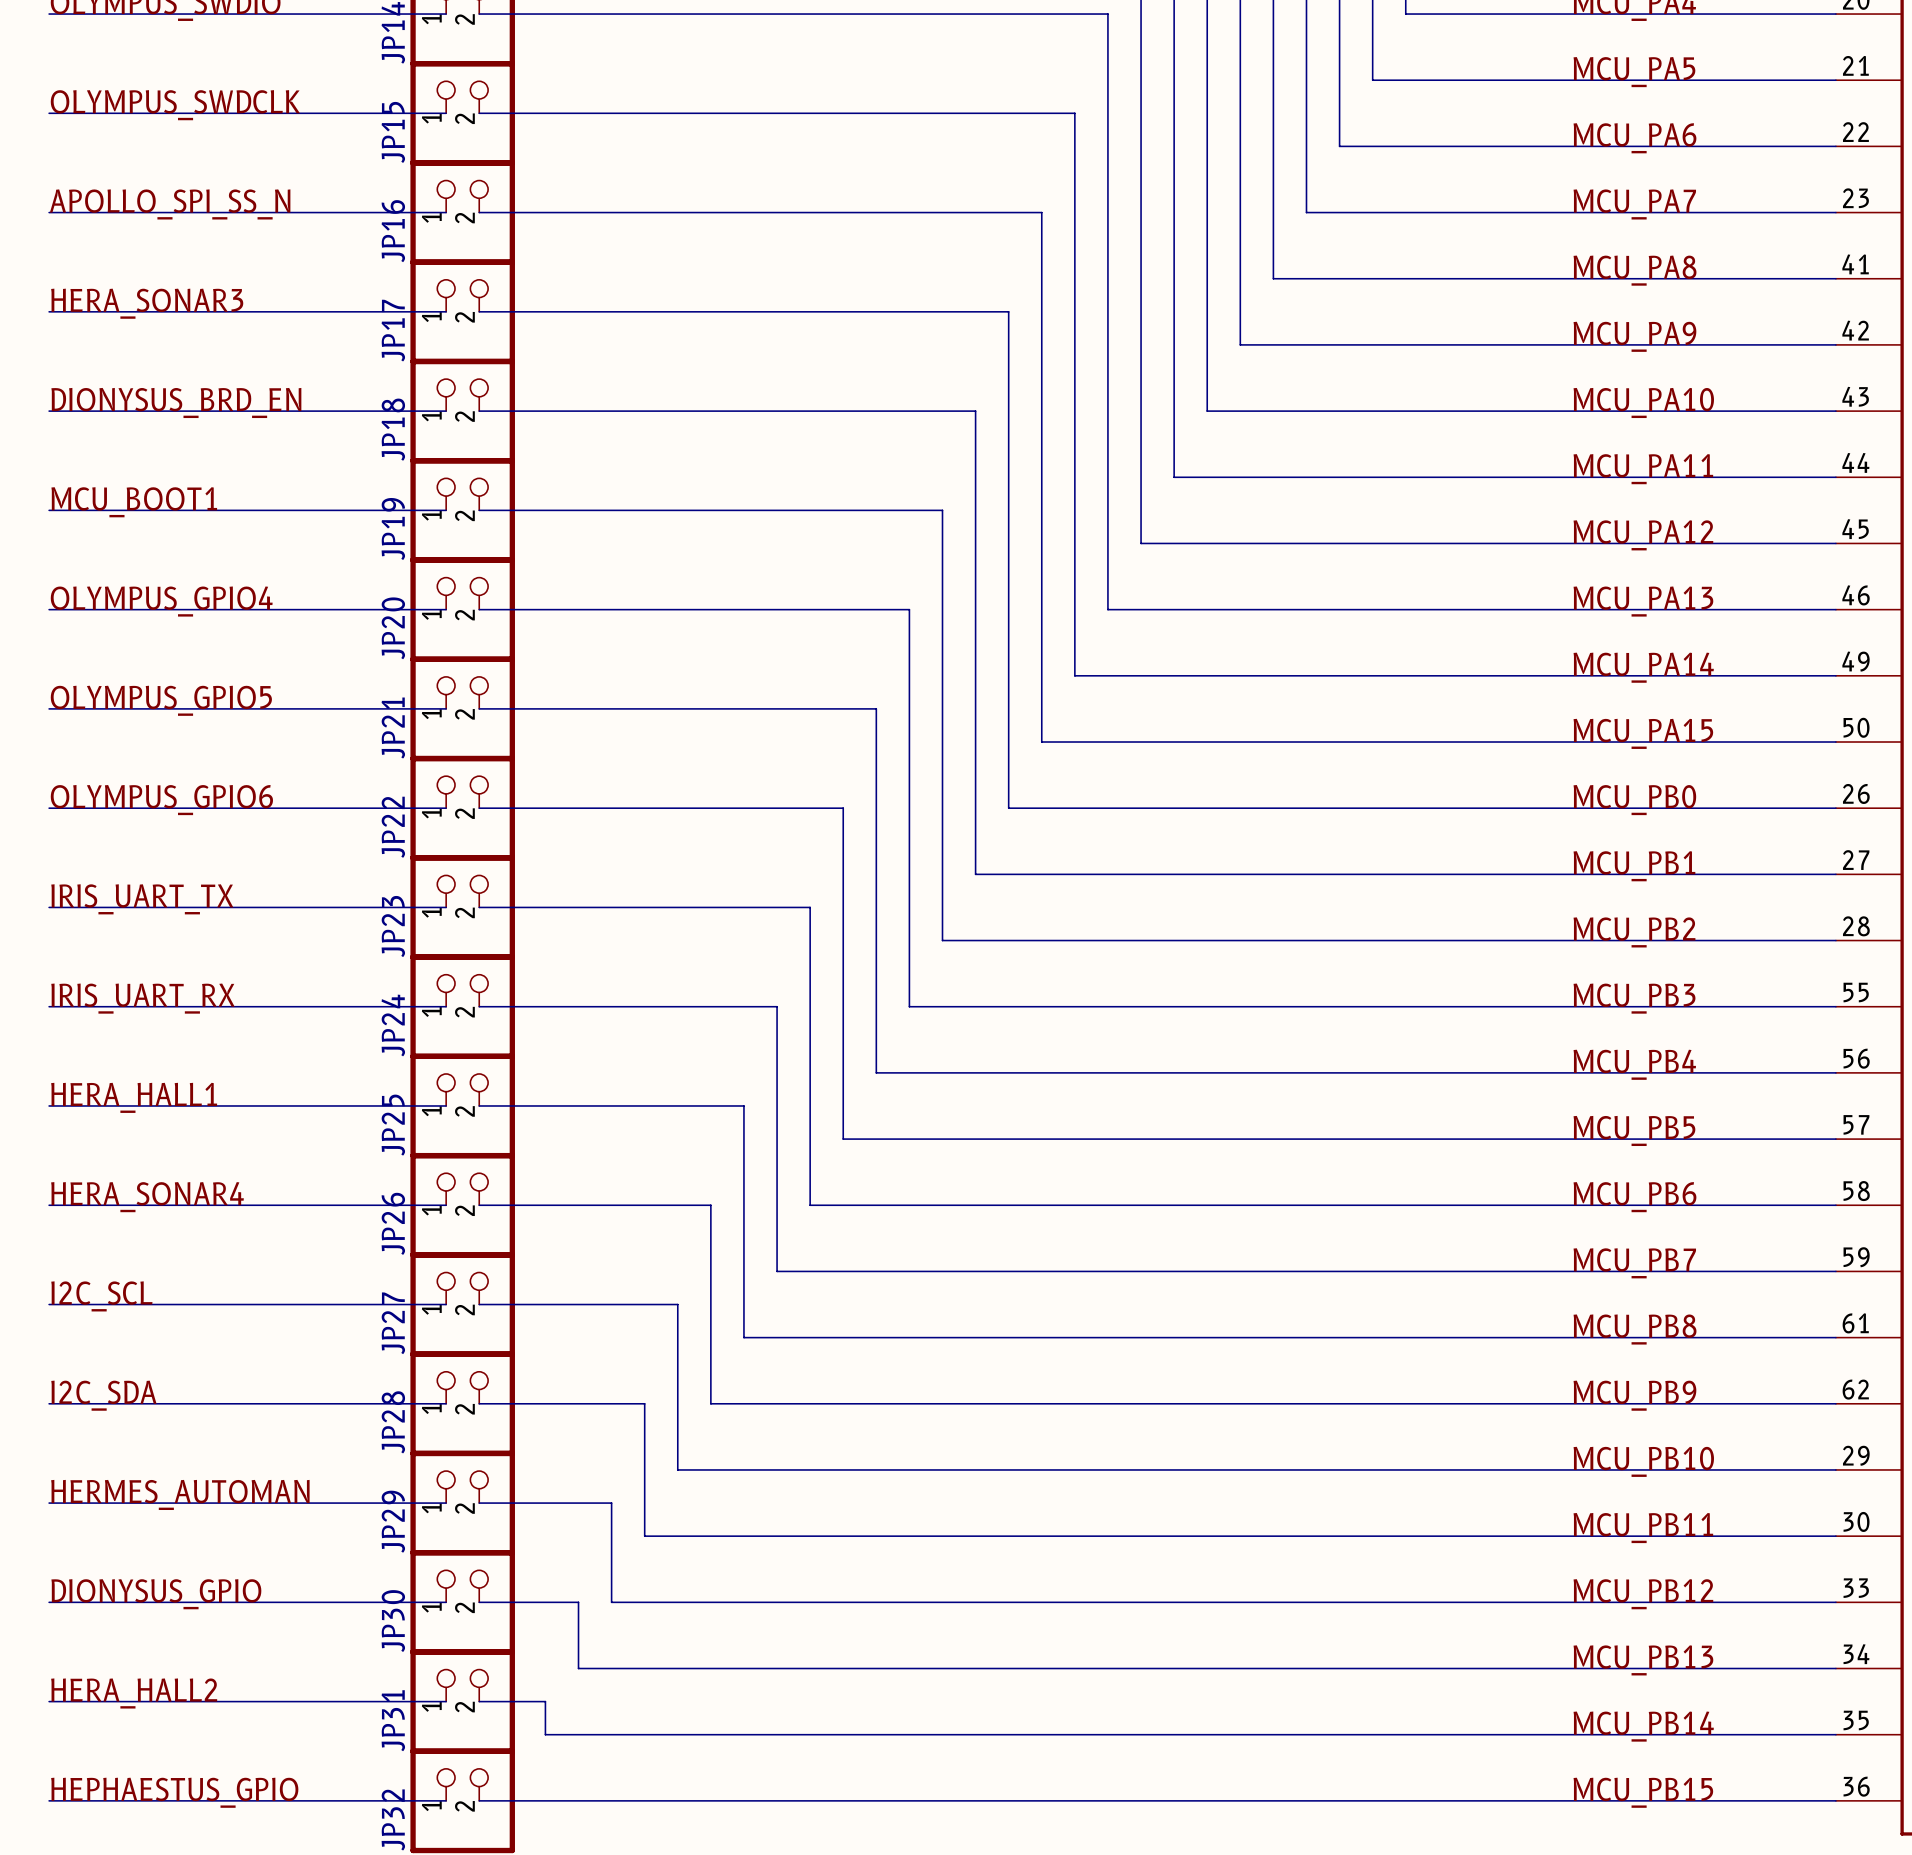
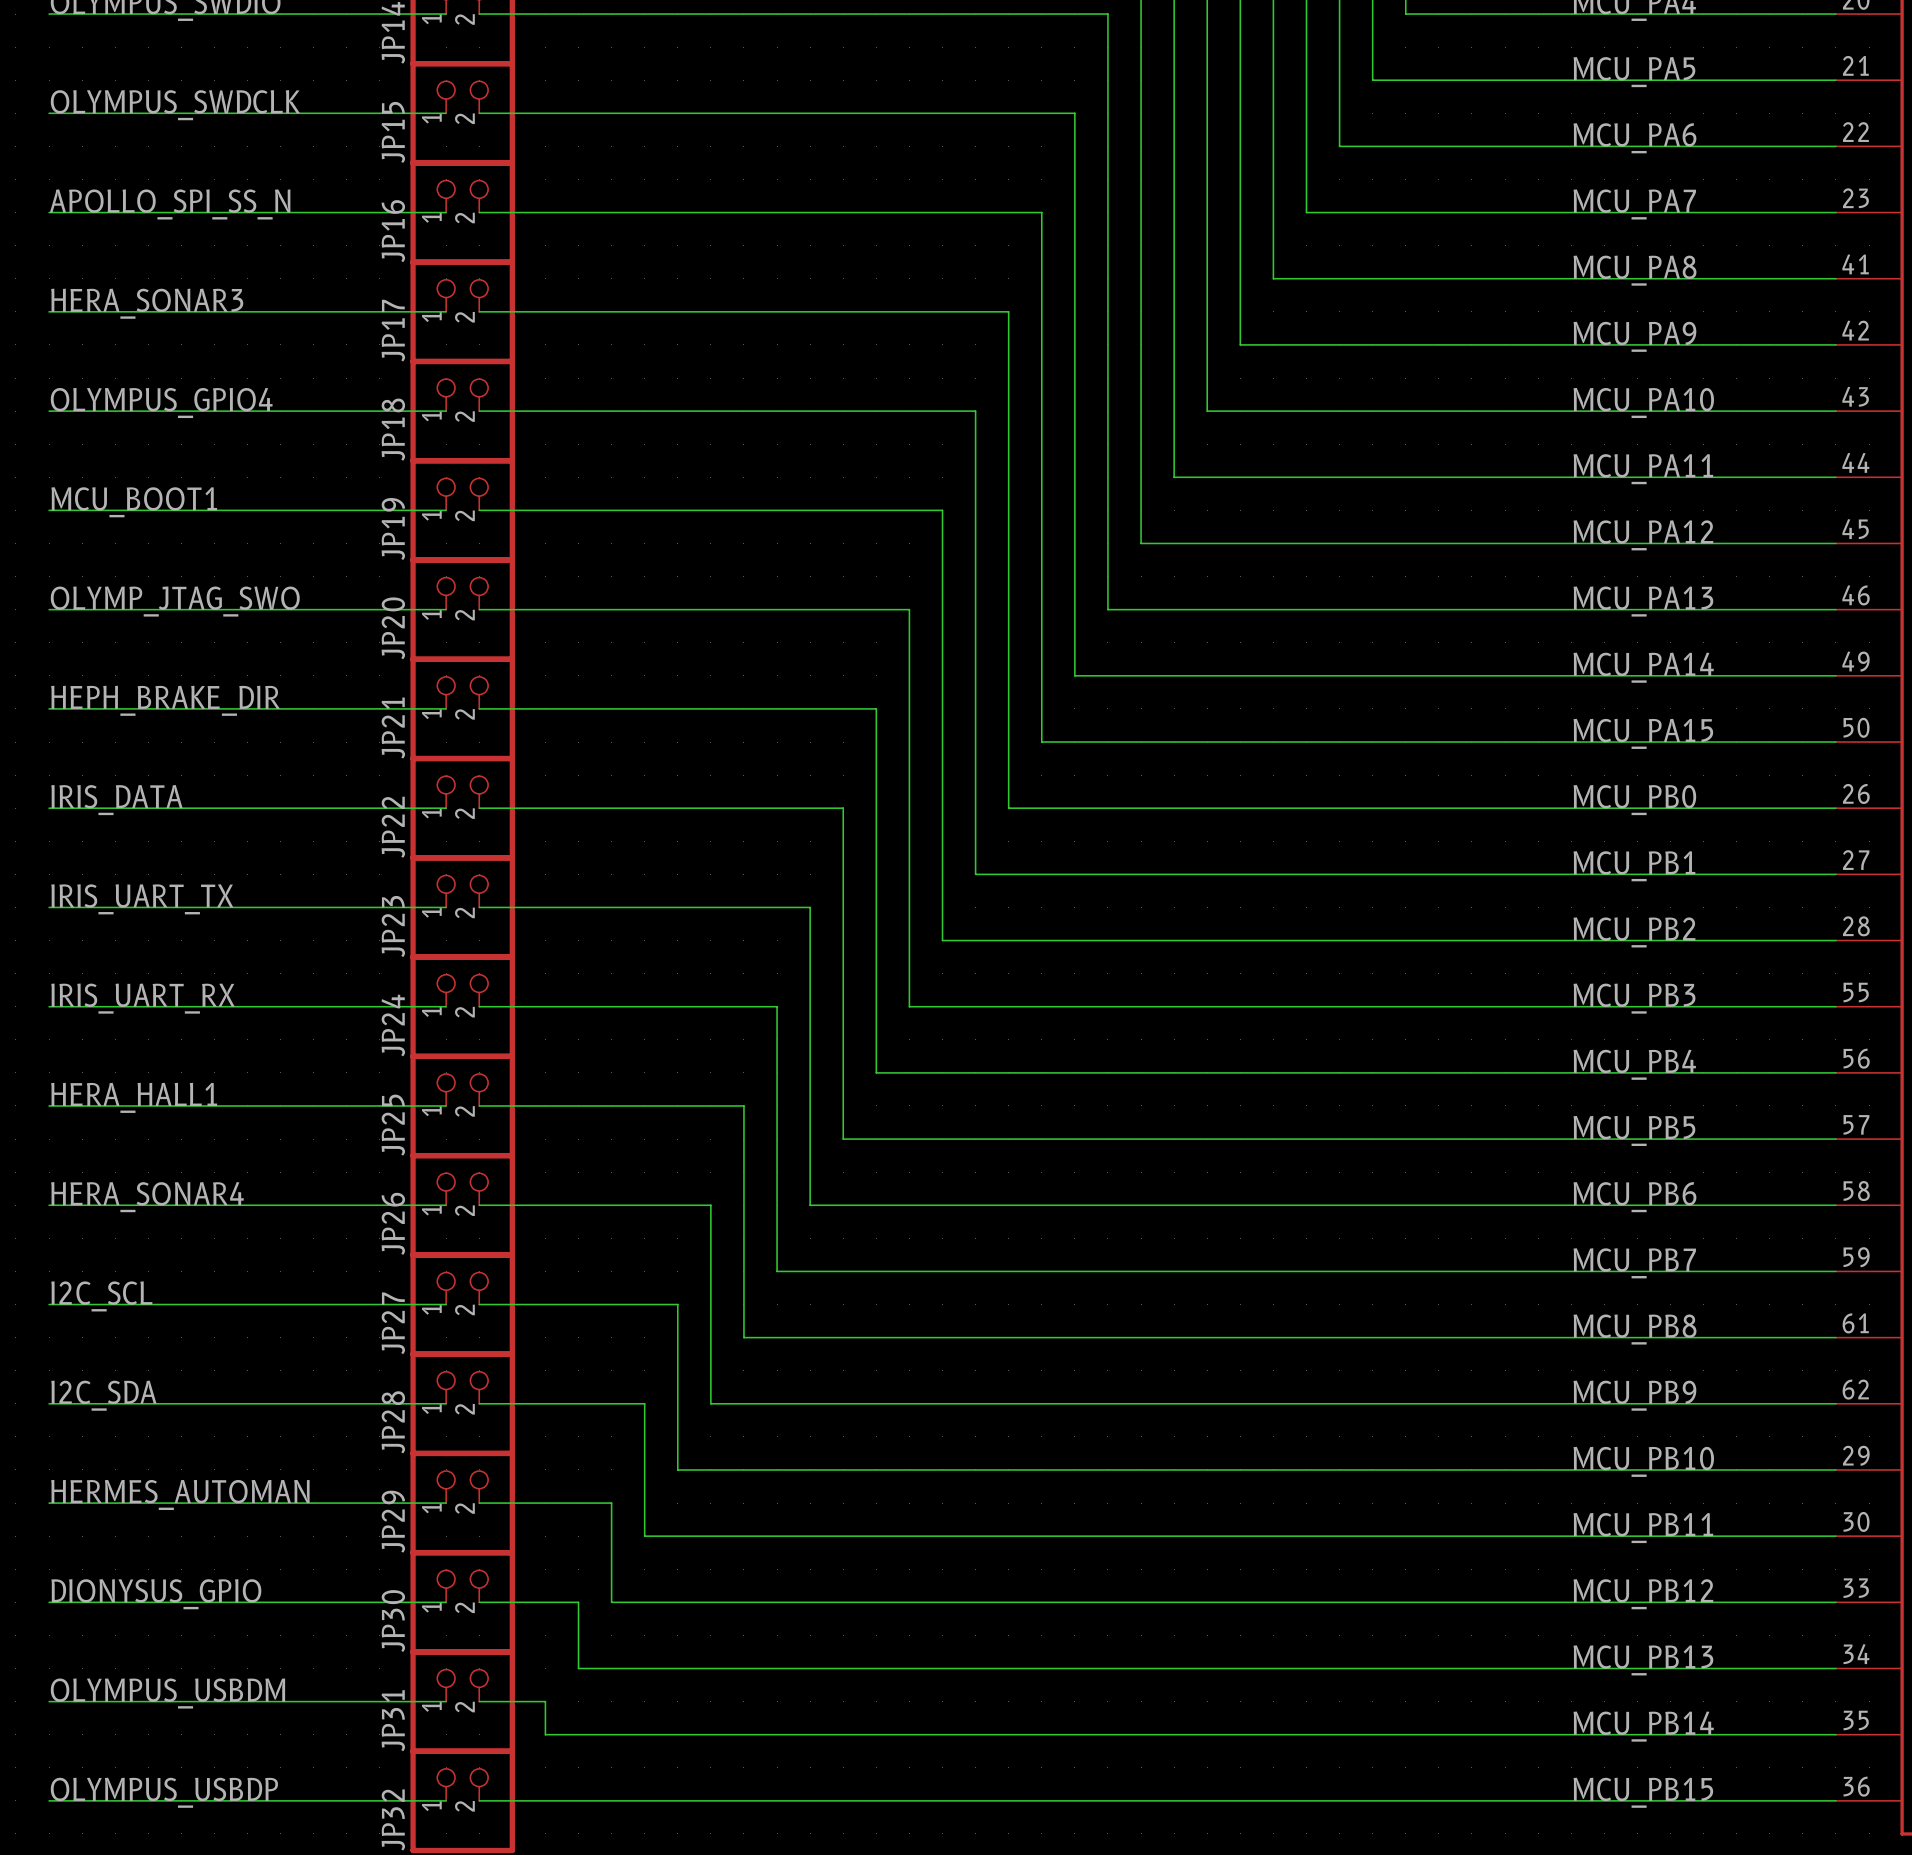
label: DIONYSUS_BRD_EN (176, 402) -> OLYMPUS_GPIO4 (161, 402)
label: OLYMPUS_GPIO4 (161, 601) -> OLYMP_JTAG_SWO (175, 601)
label: OLYMPUS_GPIO5 (161, 700) -> HEPH_BRAKE_DIR (165, 700)
label: OLYMPUS_GPIO6 (161, 800) -> IRIS_DATA (116, 800)
label: HERA_HALL2 (134, 1693) -> OLYMPUS_USBDM (167, 1693)
label: HEPHAESTUS_GPIO (174, 1792) -> OLYMPUS_USBDP (164, 1792)

